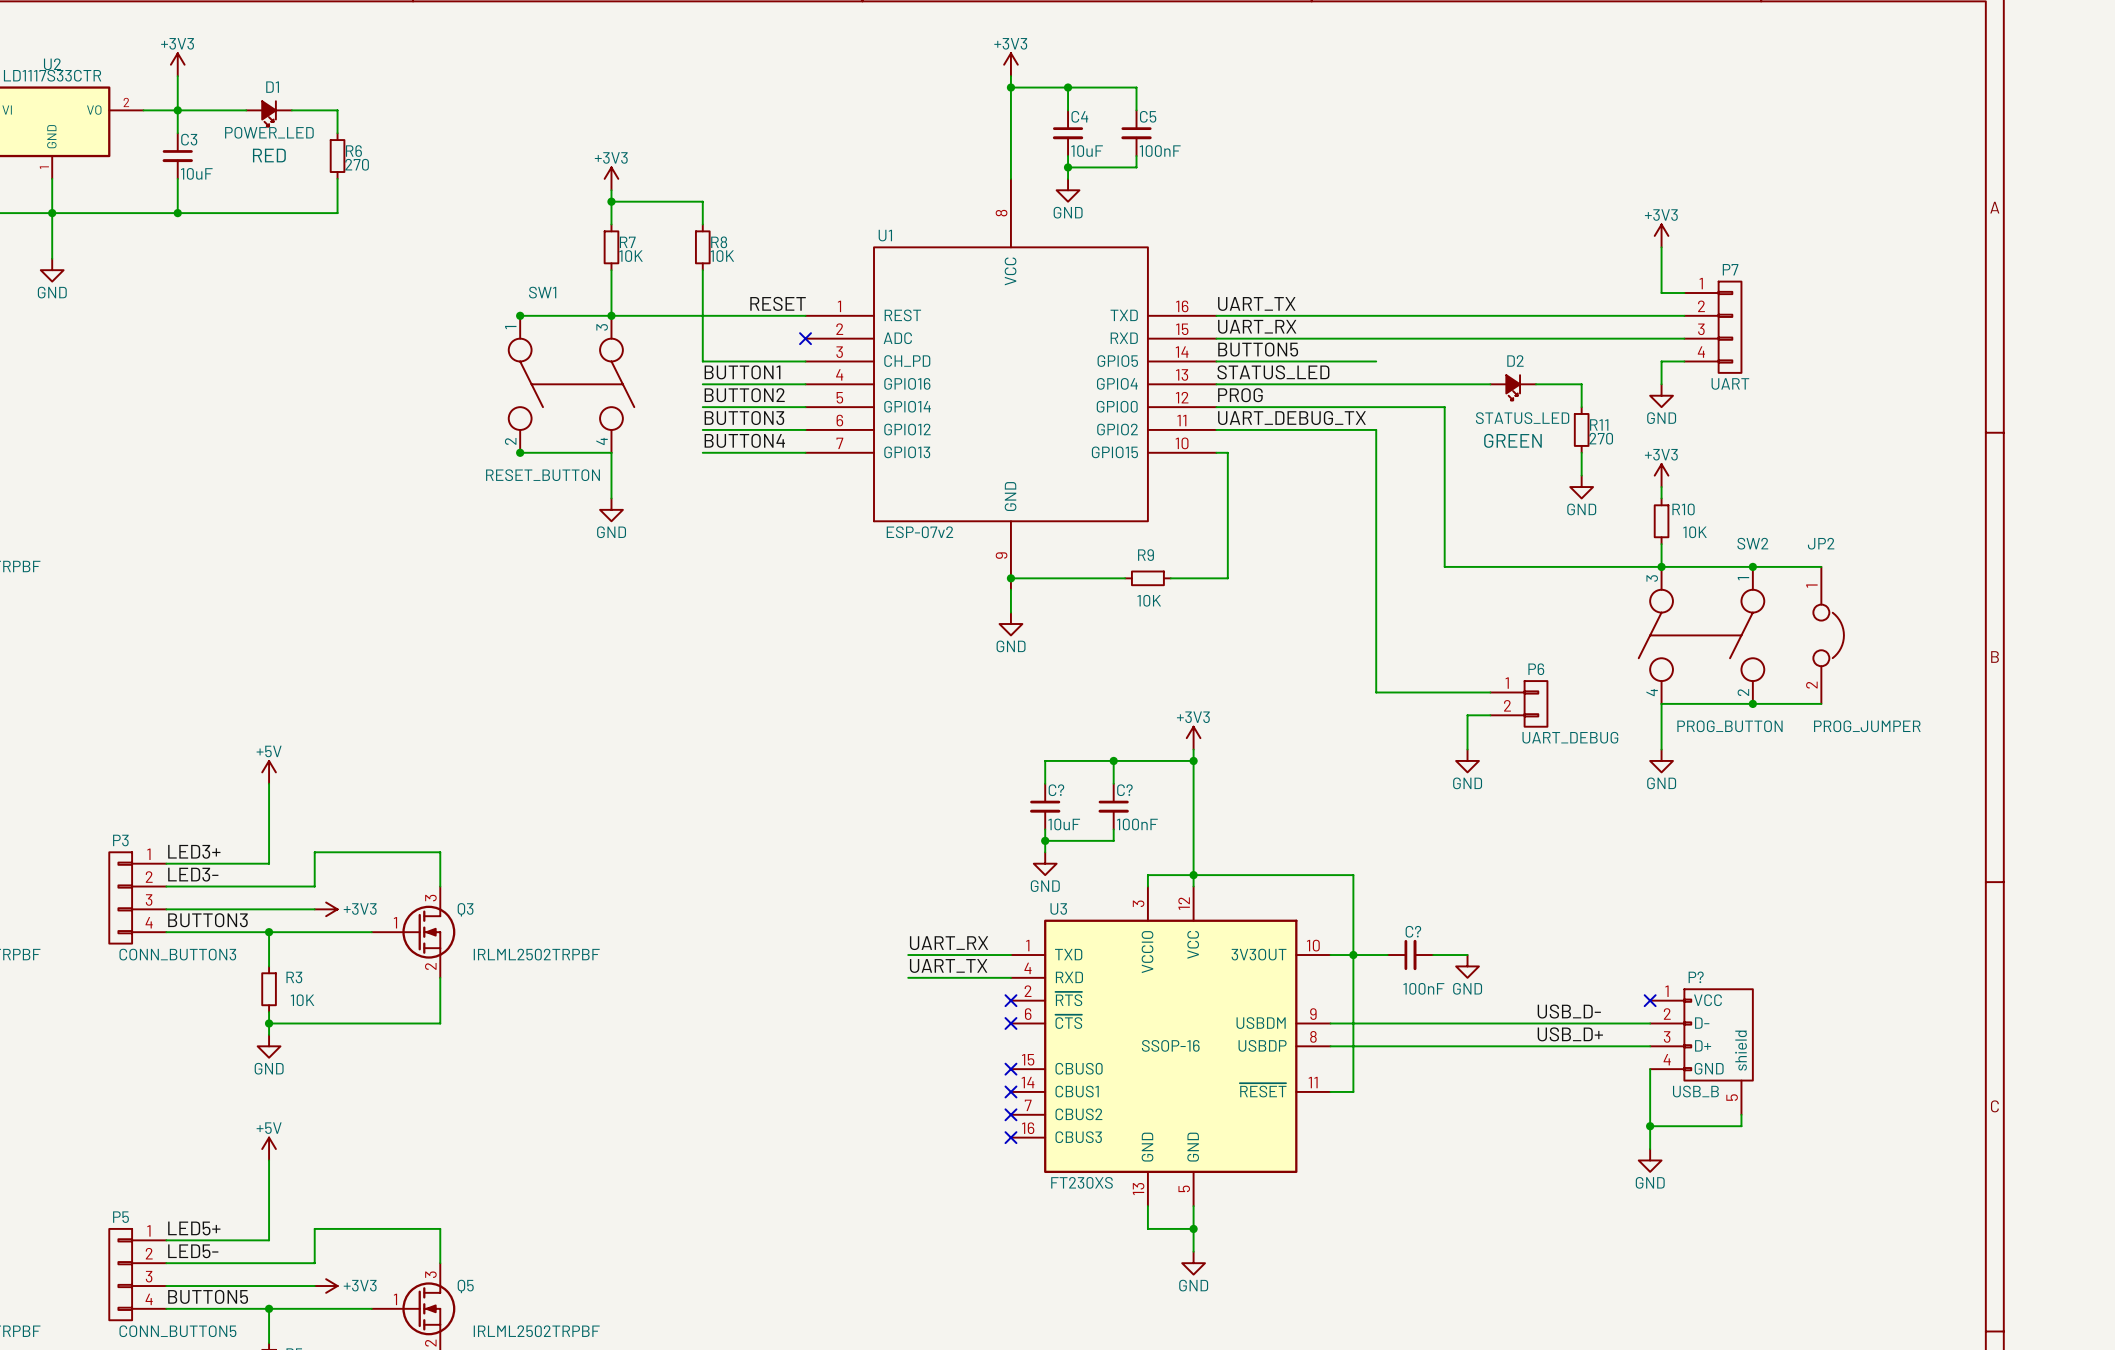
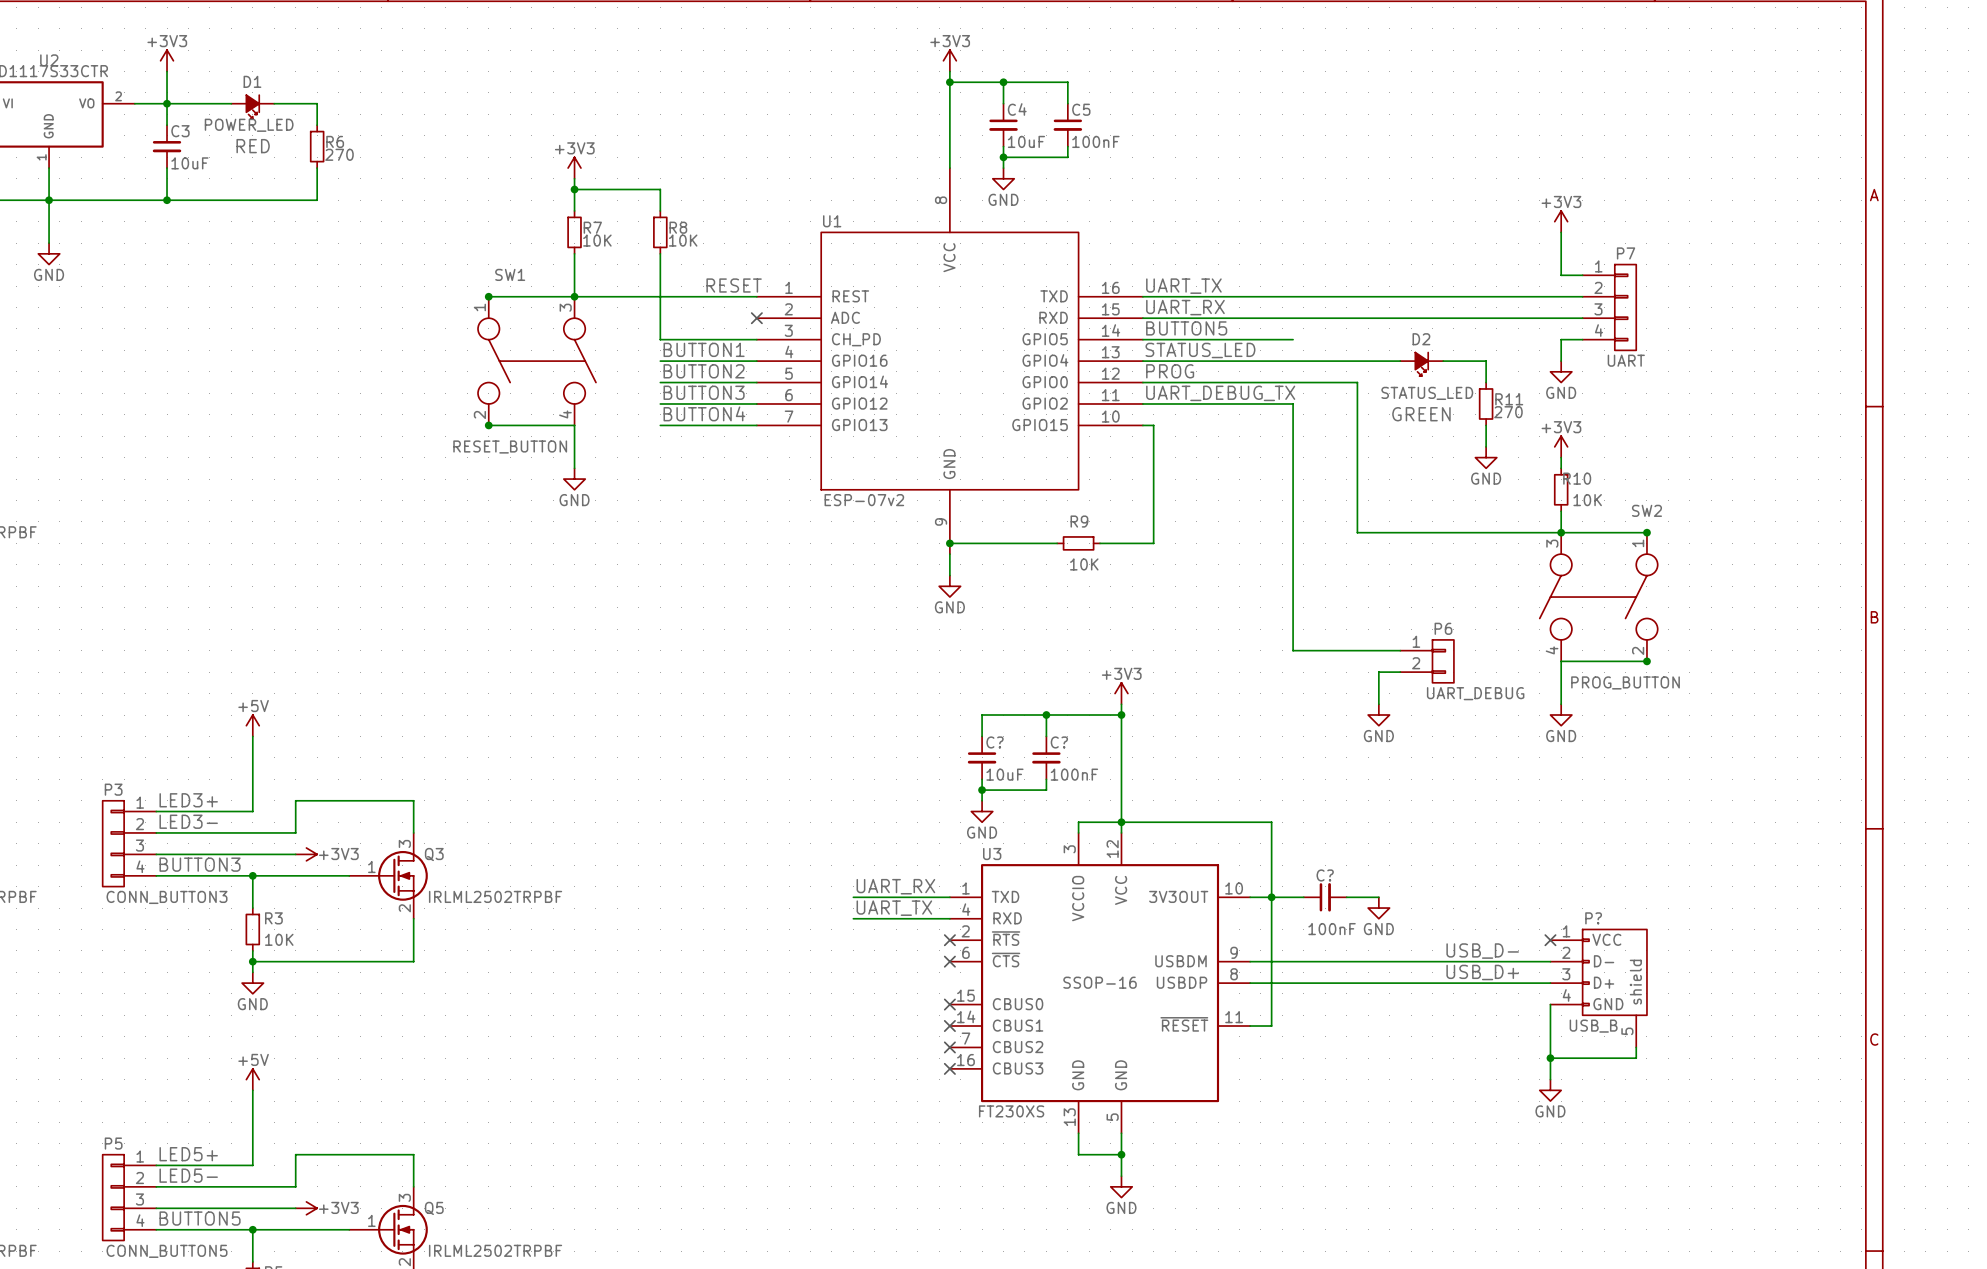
wire: (1752, 566) (1821, 566) -> none
JP2: PROG_JUMPER (1828, 635) -> none
wire: (1752, 703) (1821, 703) -> none

